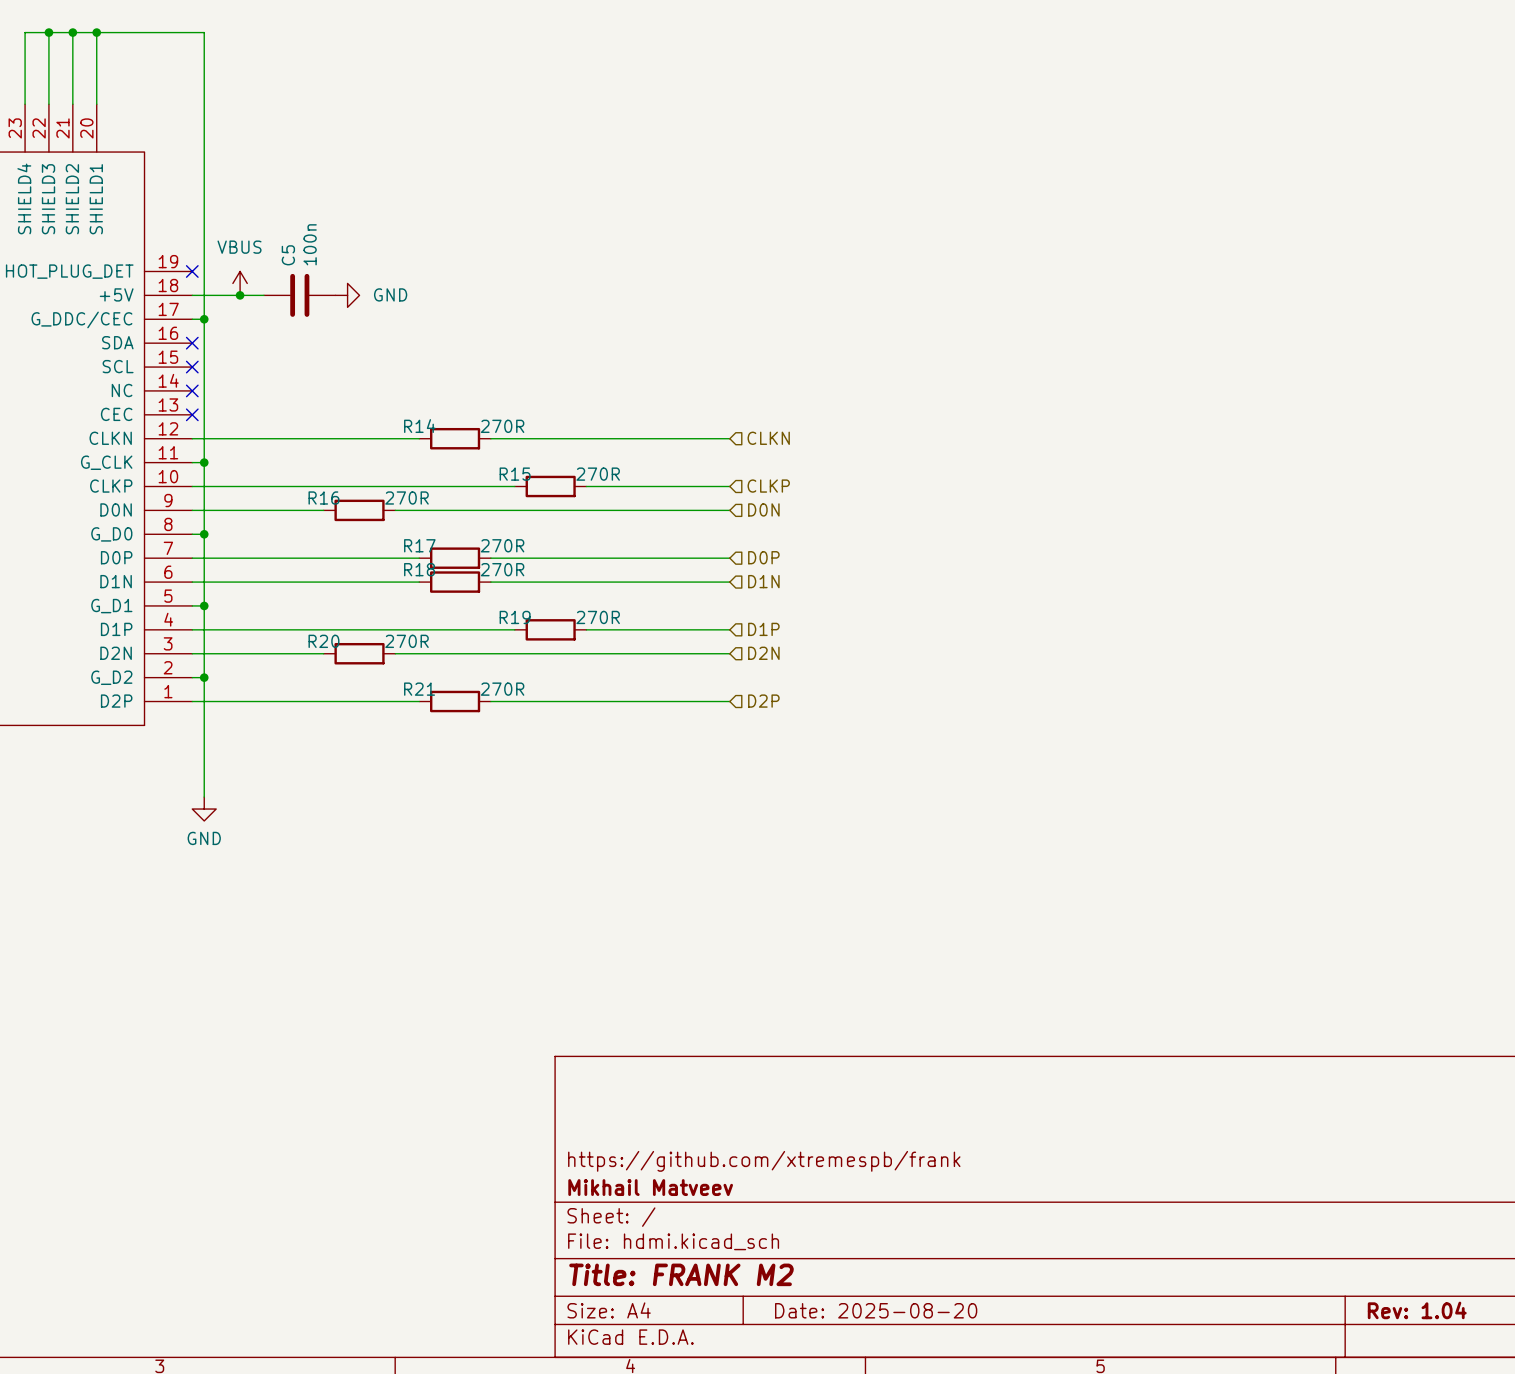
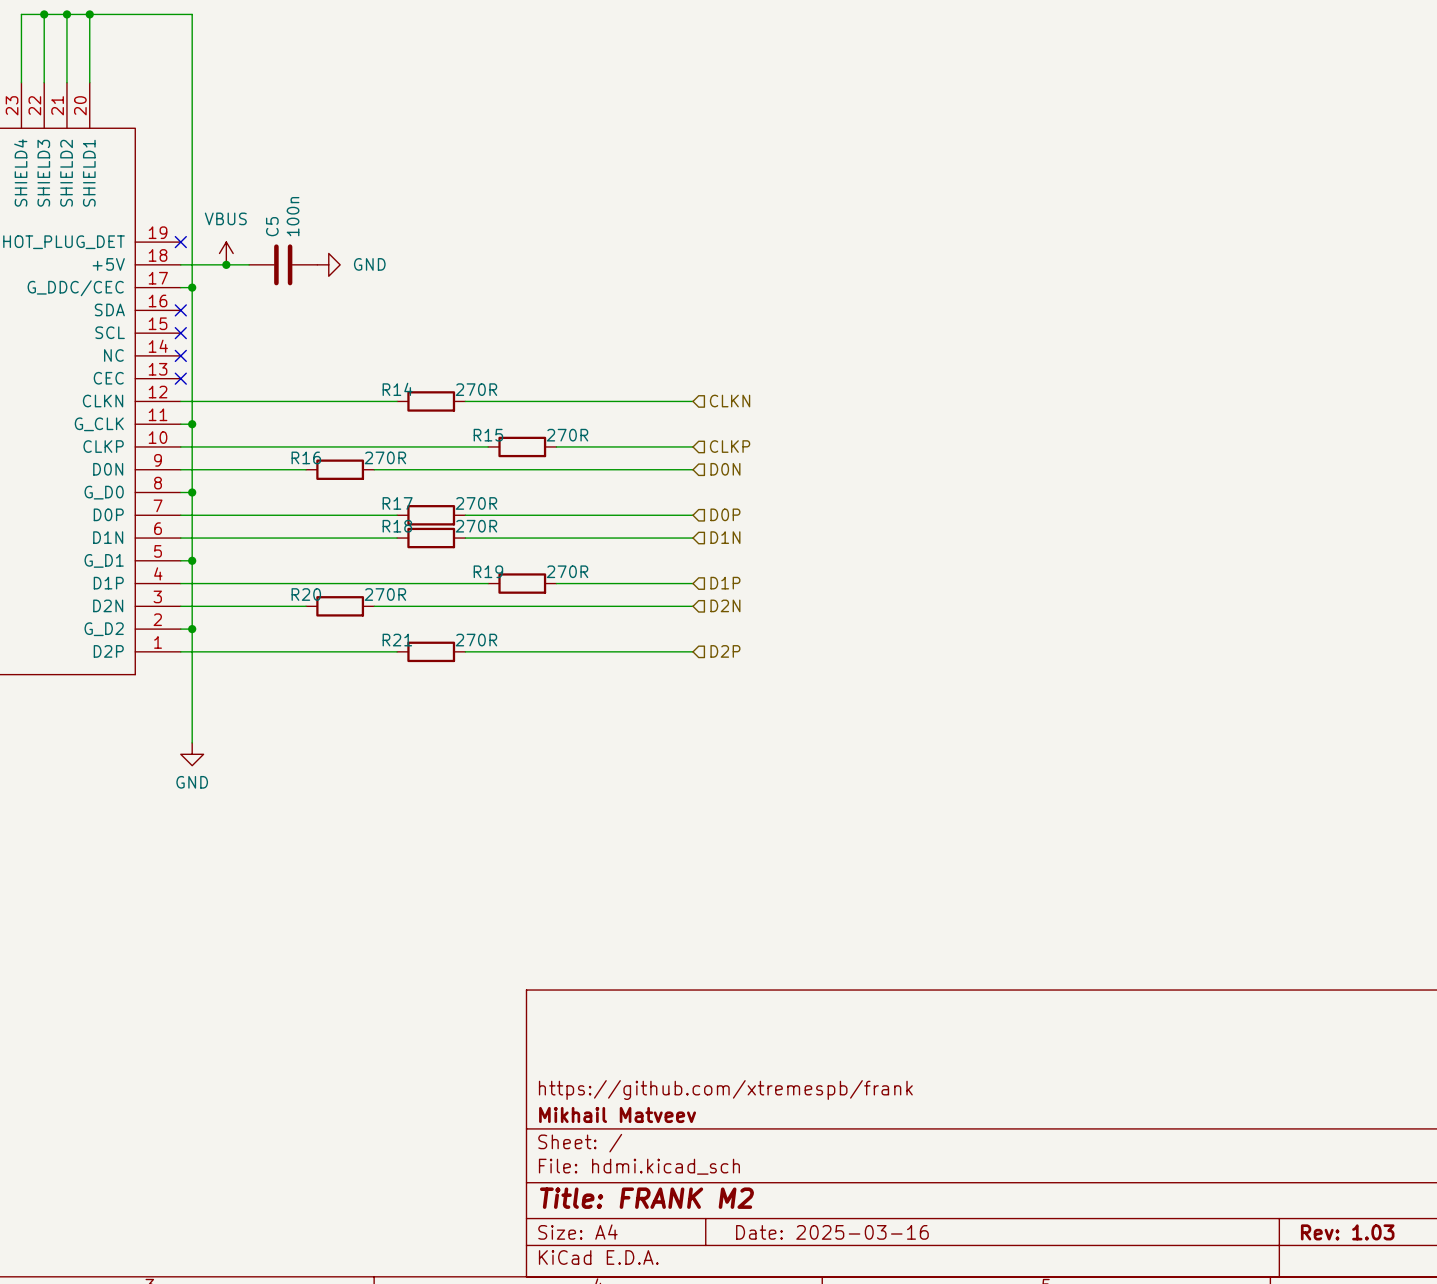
title block: Date: 2025-08-20 (876, 1310) -> Date: 2025-03-16 (832, 1232)
title block: Rev: 1.04 (1417, 1310) -> Rev: 1.03 (1347, 1232)

